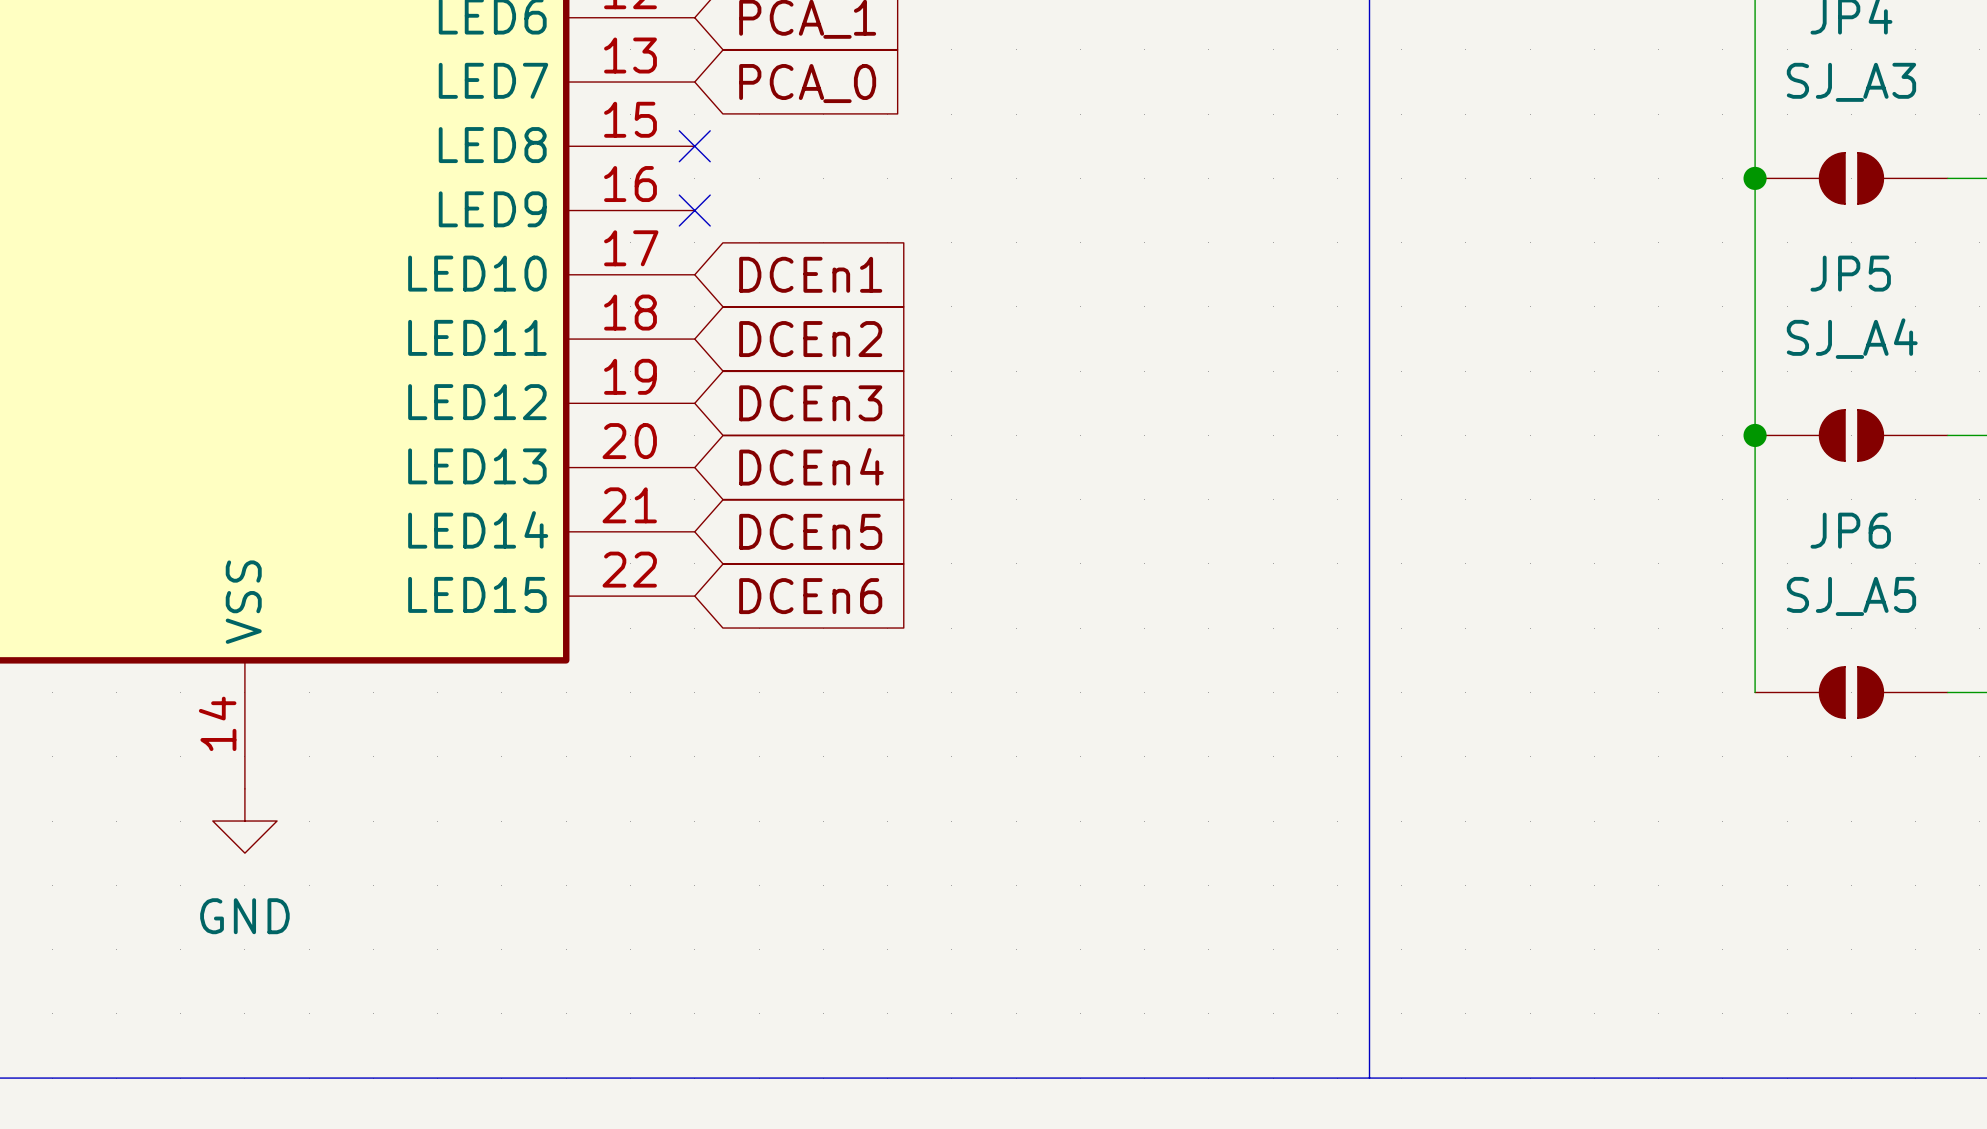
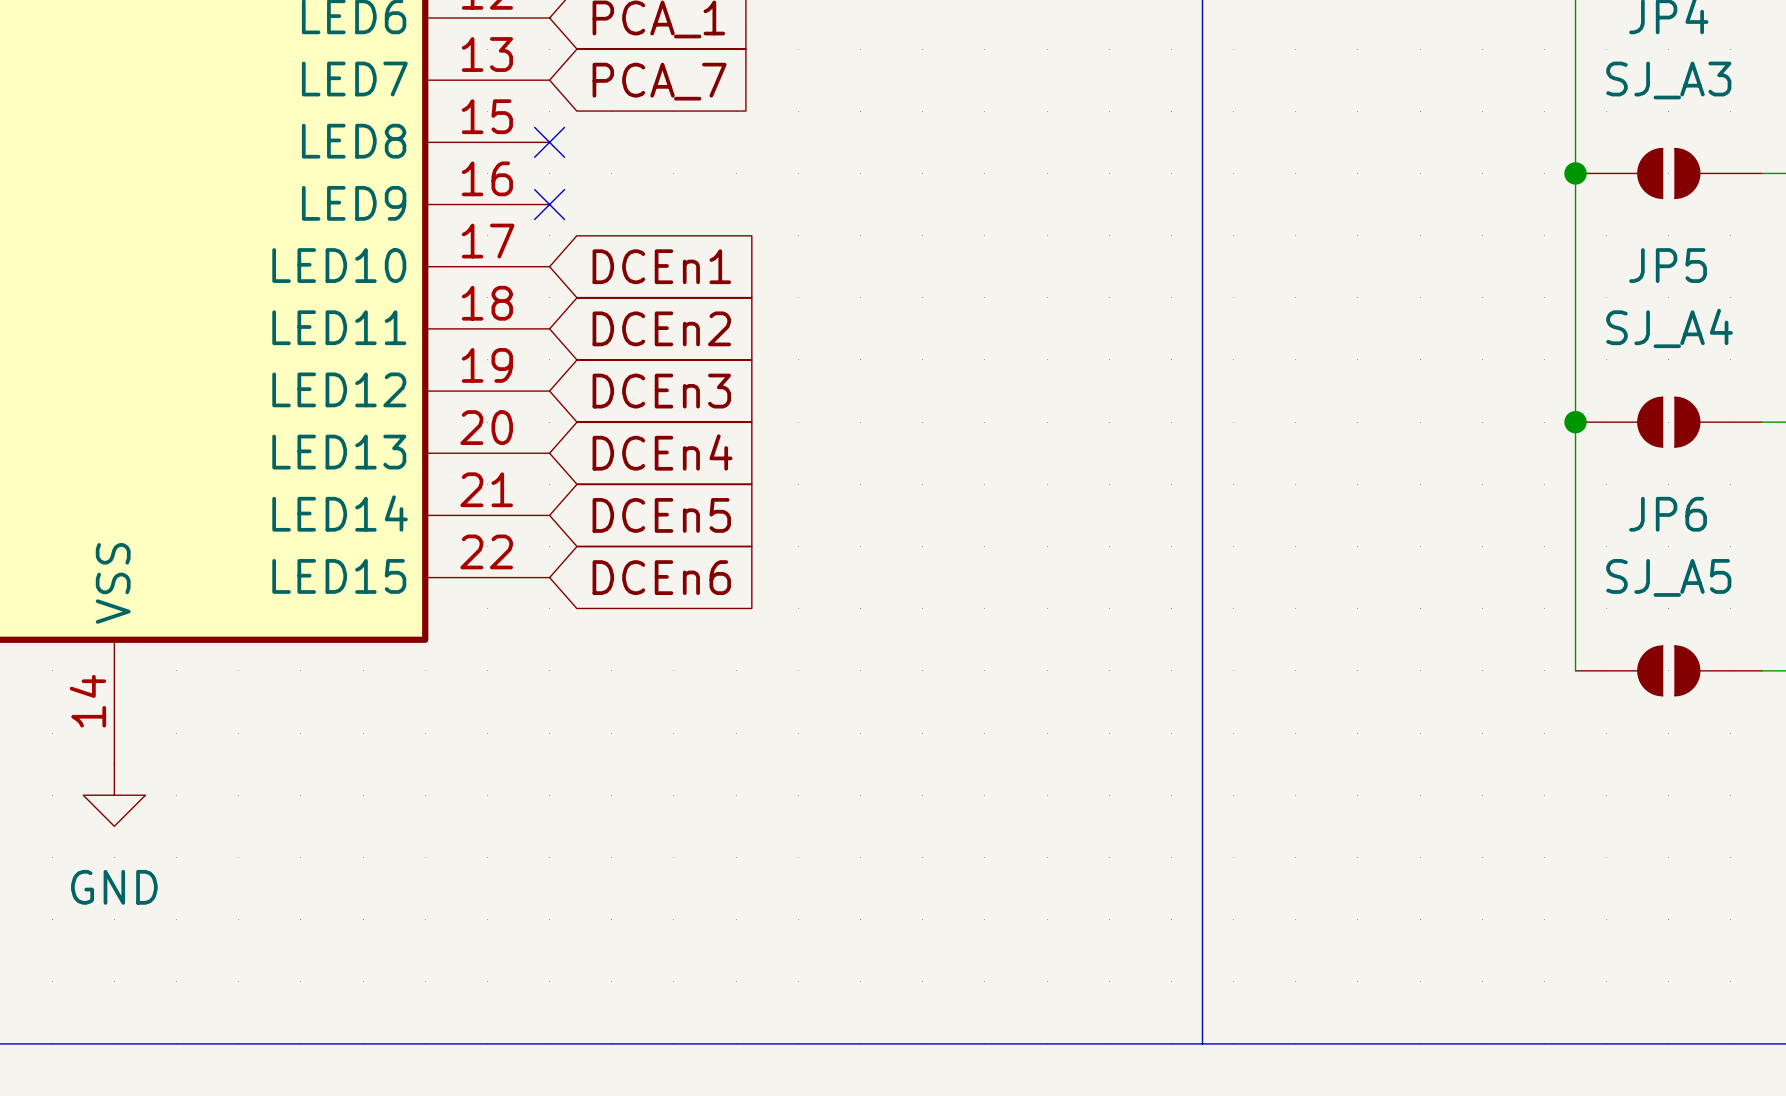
global label: PCA_0 (807, 83) -> PCA_7 (659, 81)

